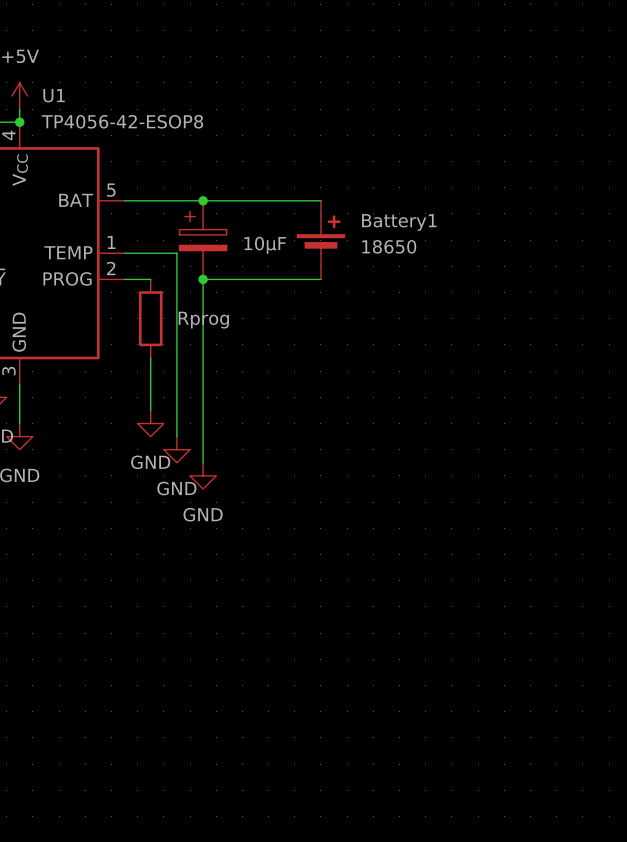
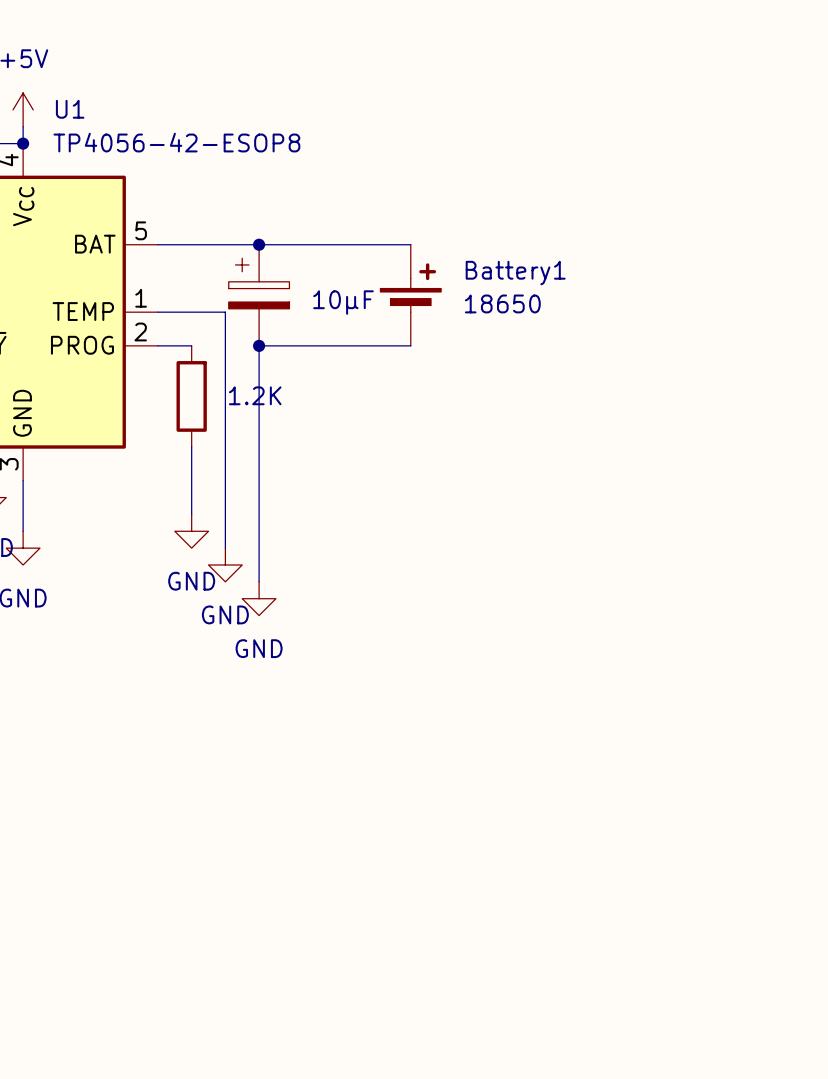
part value: Rprog (203, 320) -> 1.2K (255, 395)

